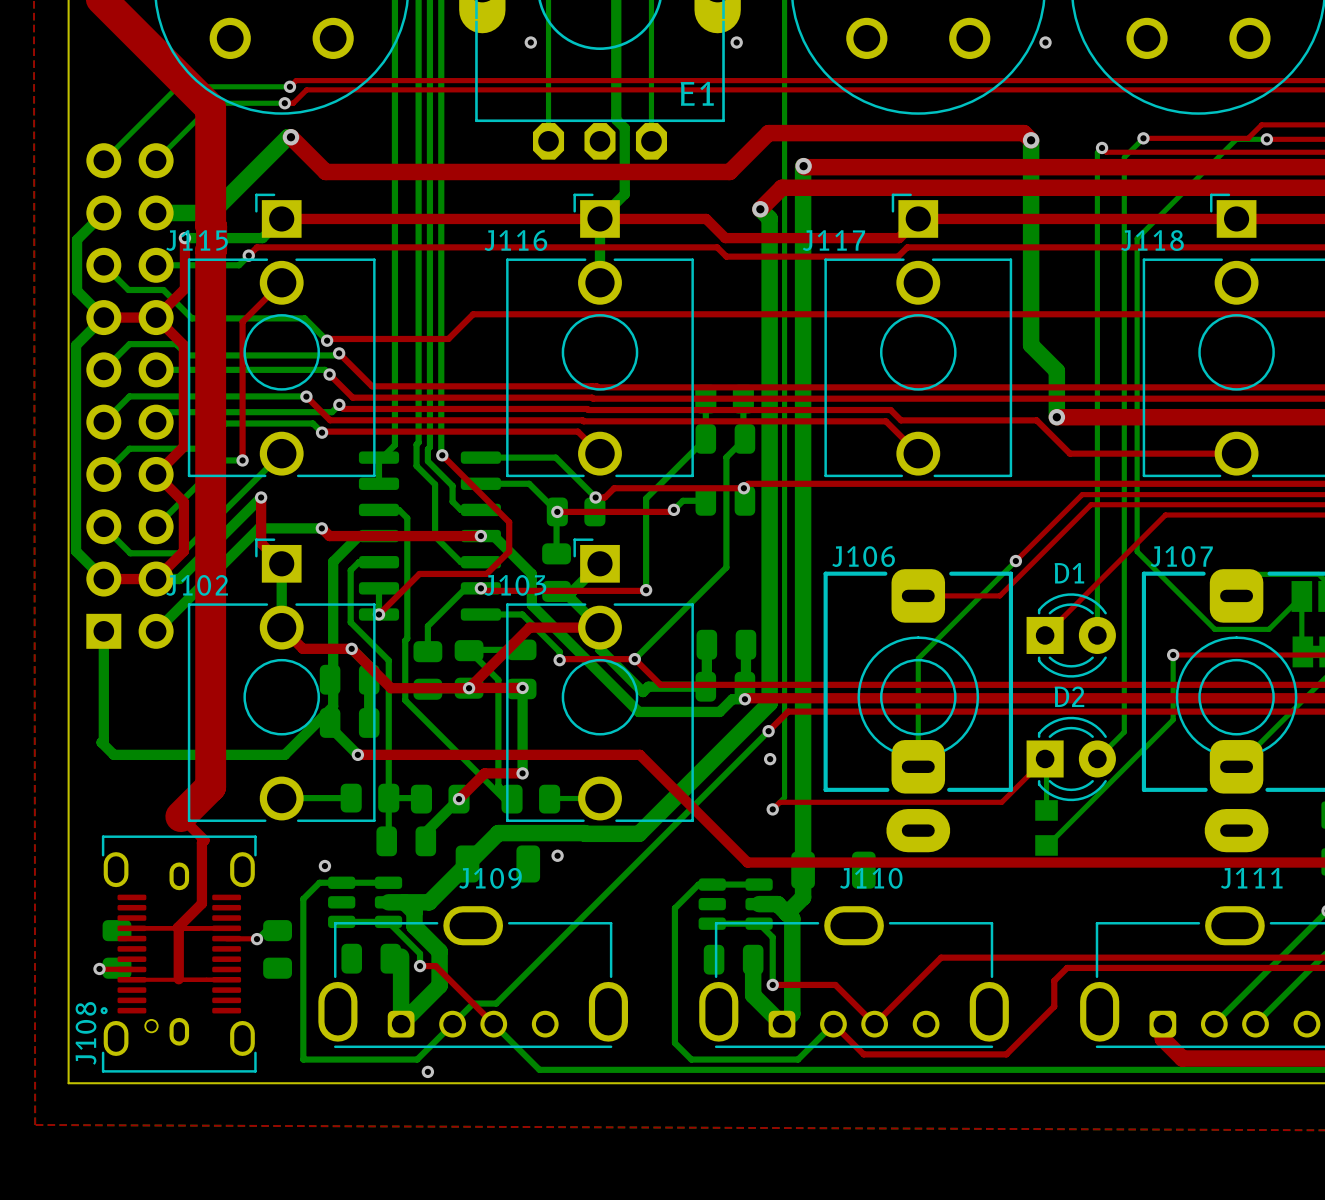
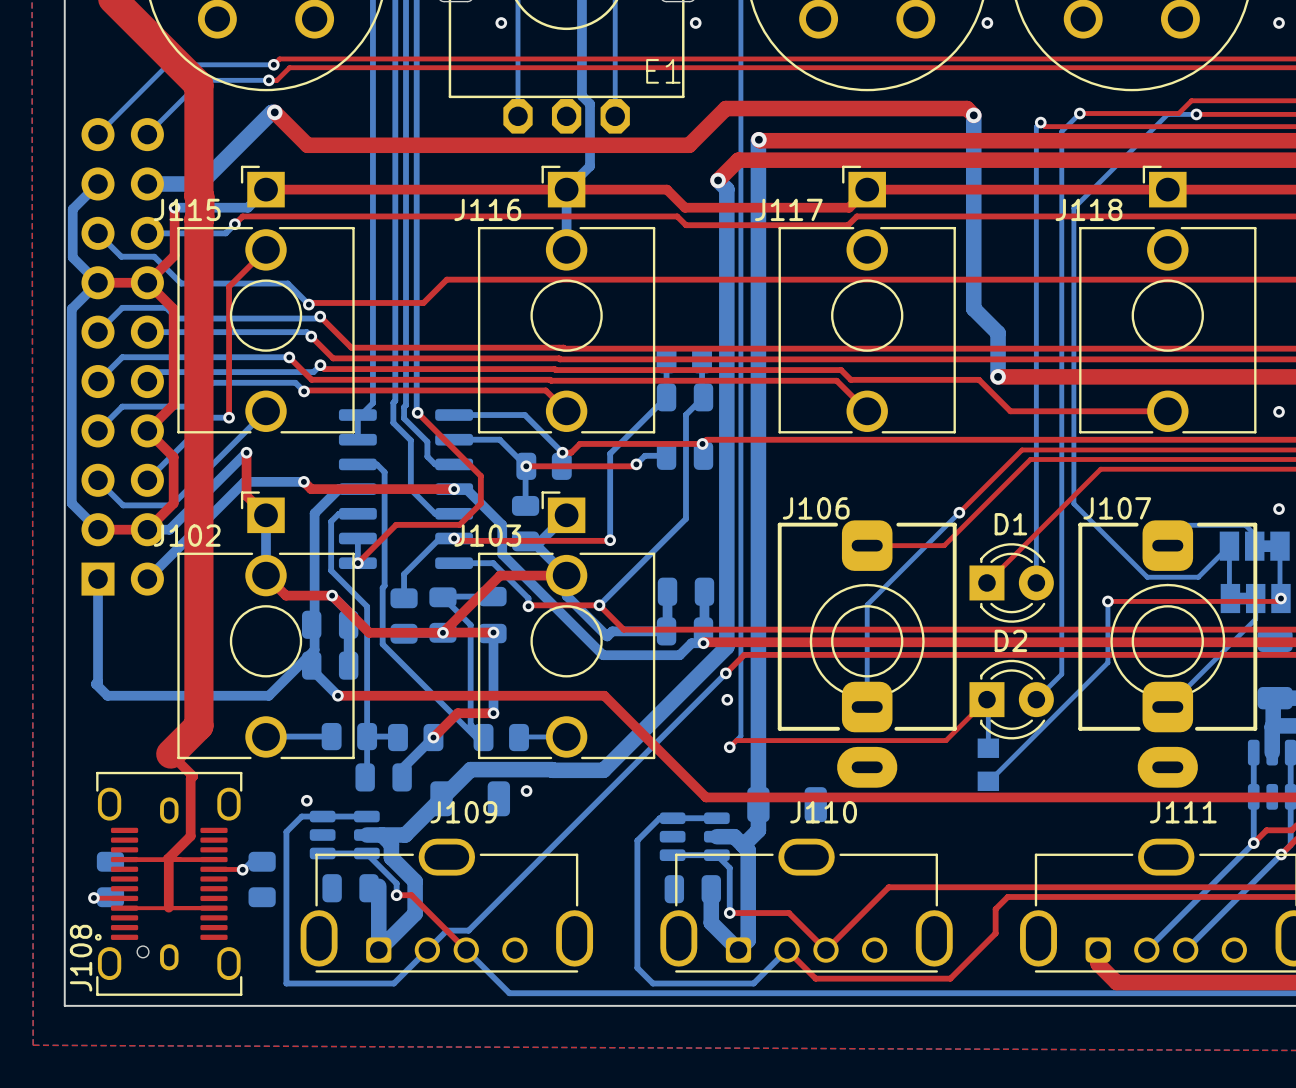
via: (427, 1071) -> none

